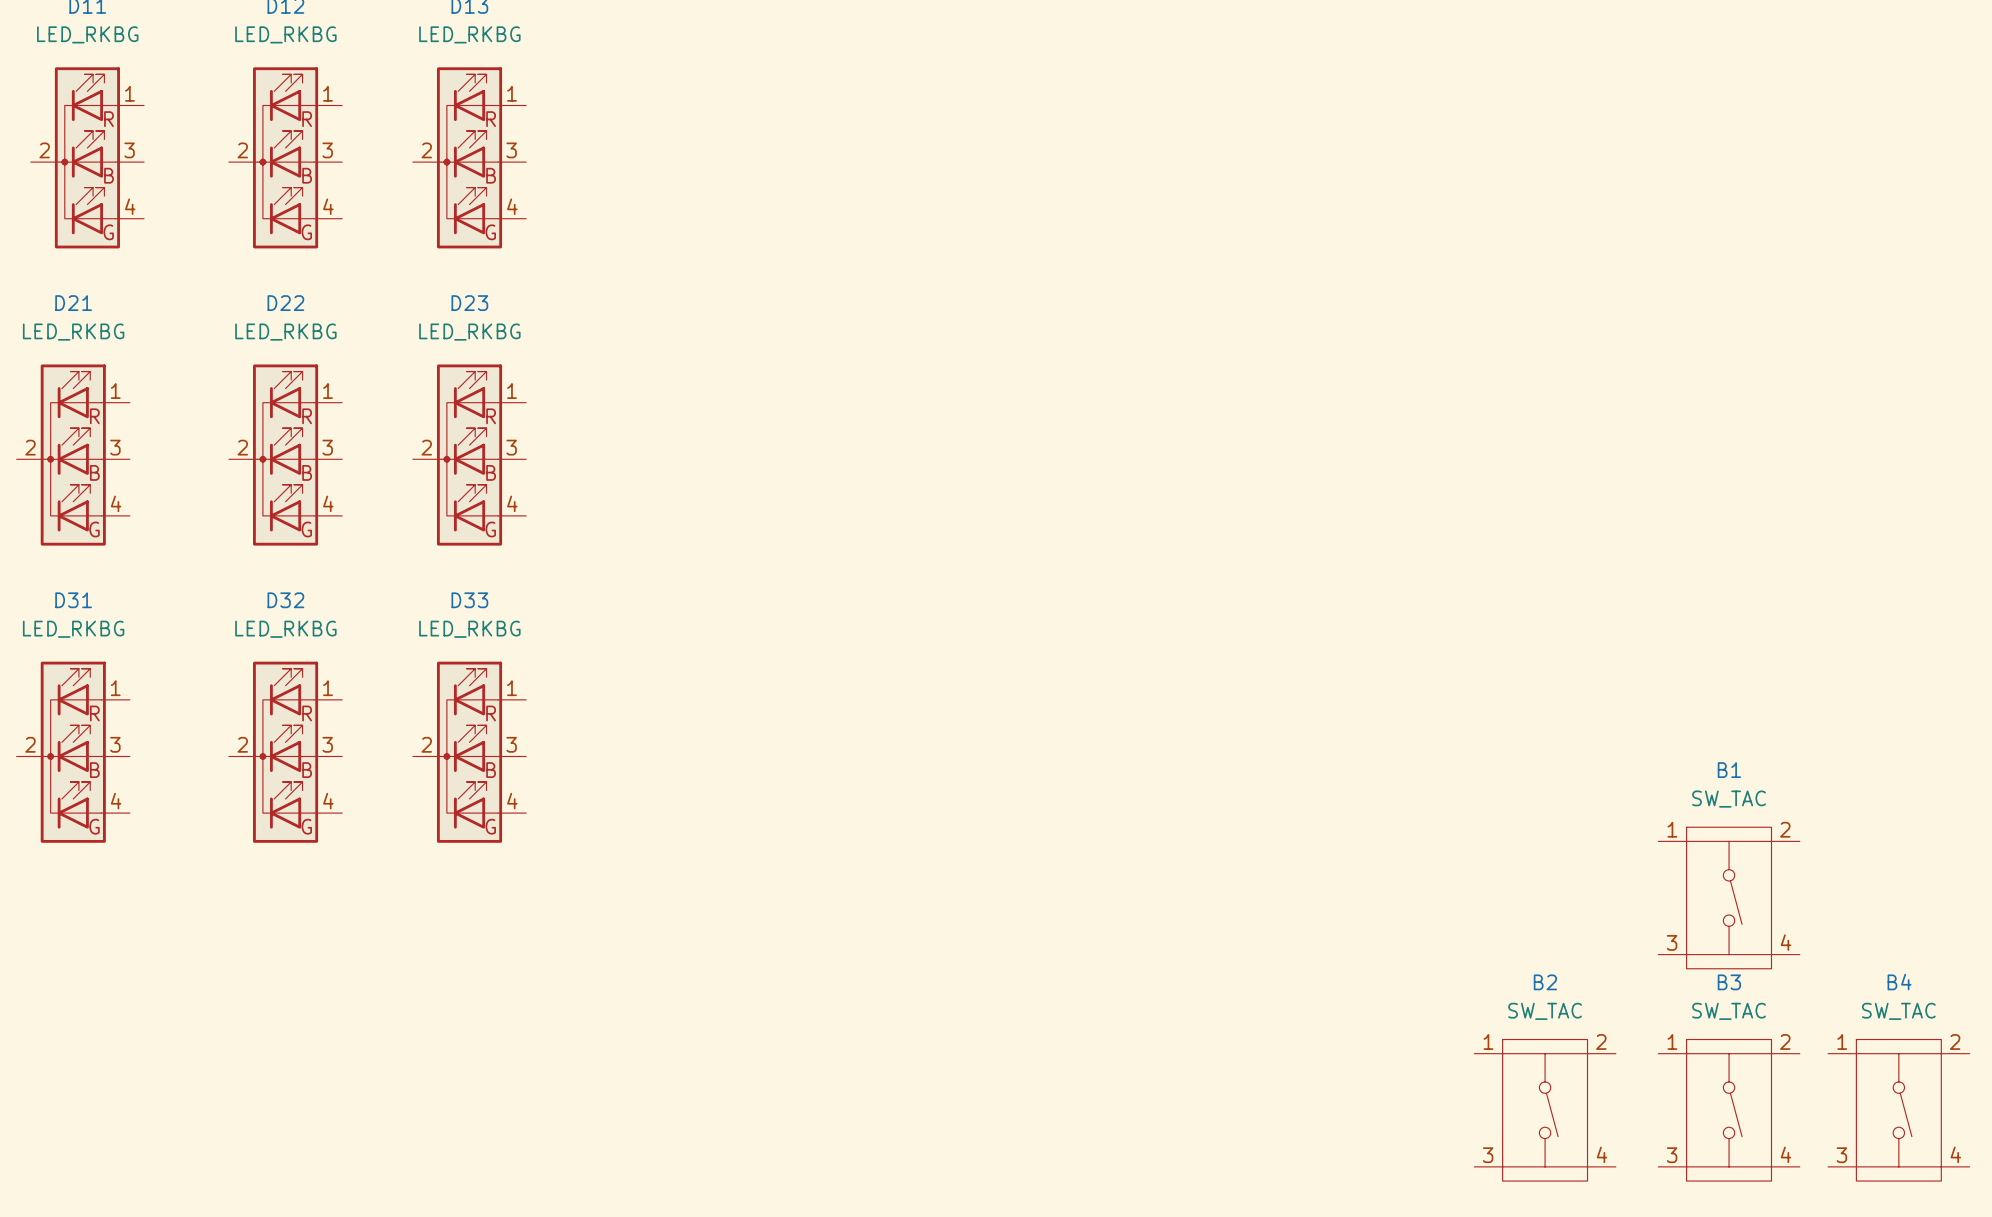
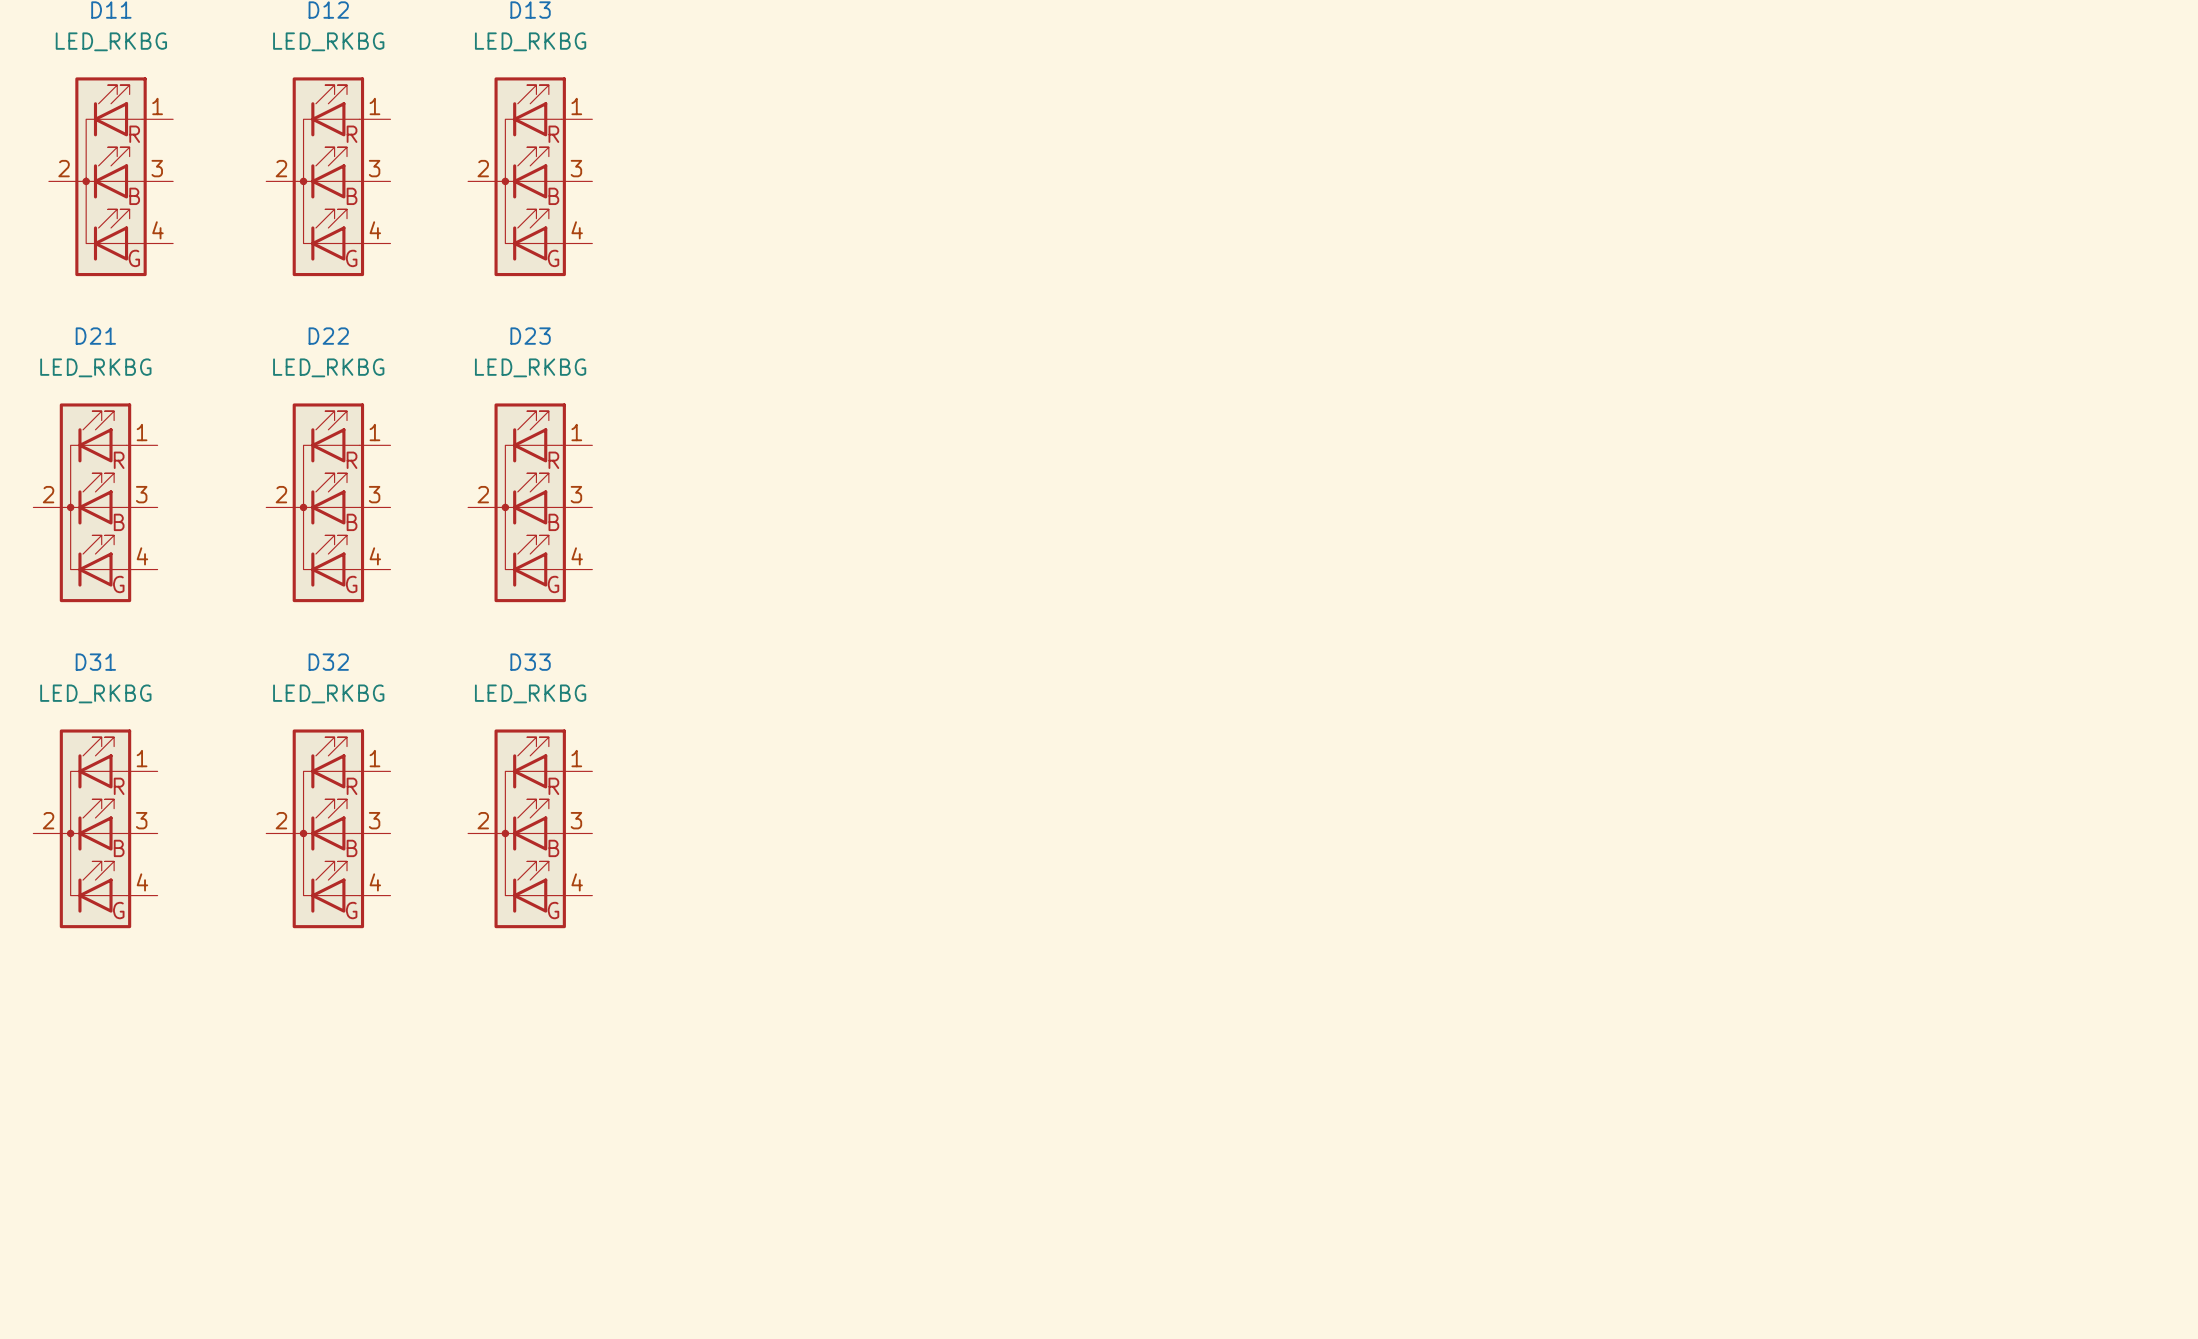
B1: SW_TAC (1729, 897) -> none
B2: SW_TAC (1545, 1110) -> none
B3: SW_TAC (1729, 1110) -> none
B4: SW_TAC (1898, 1110) -> none

